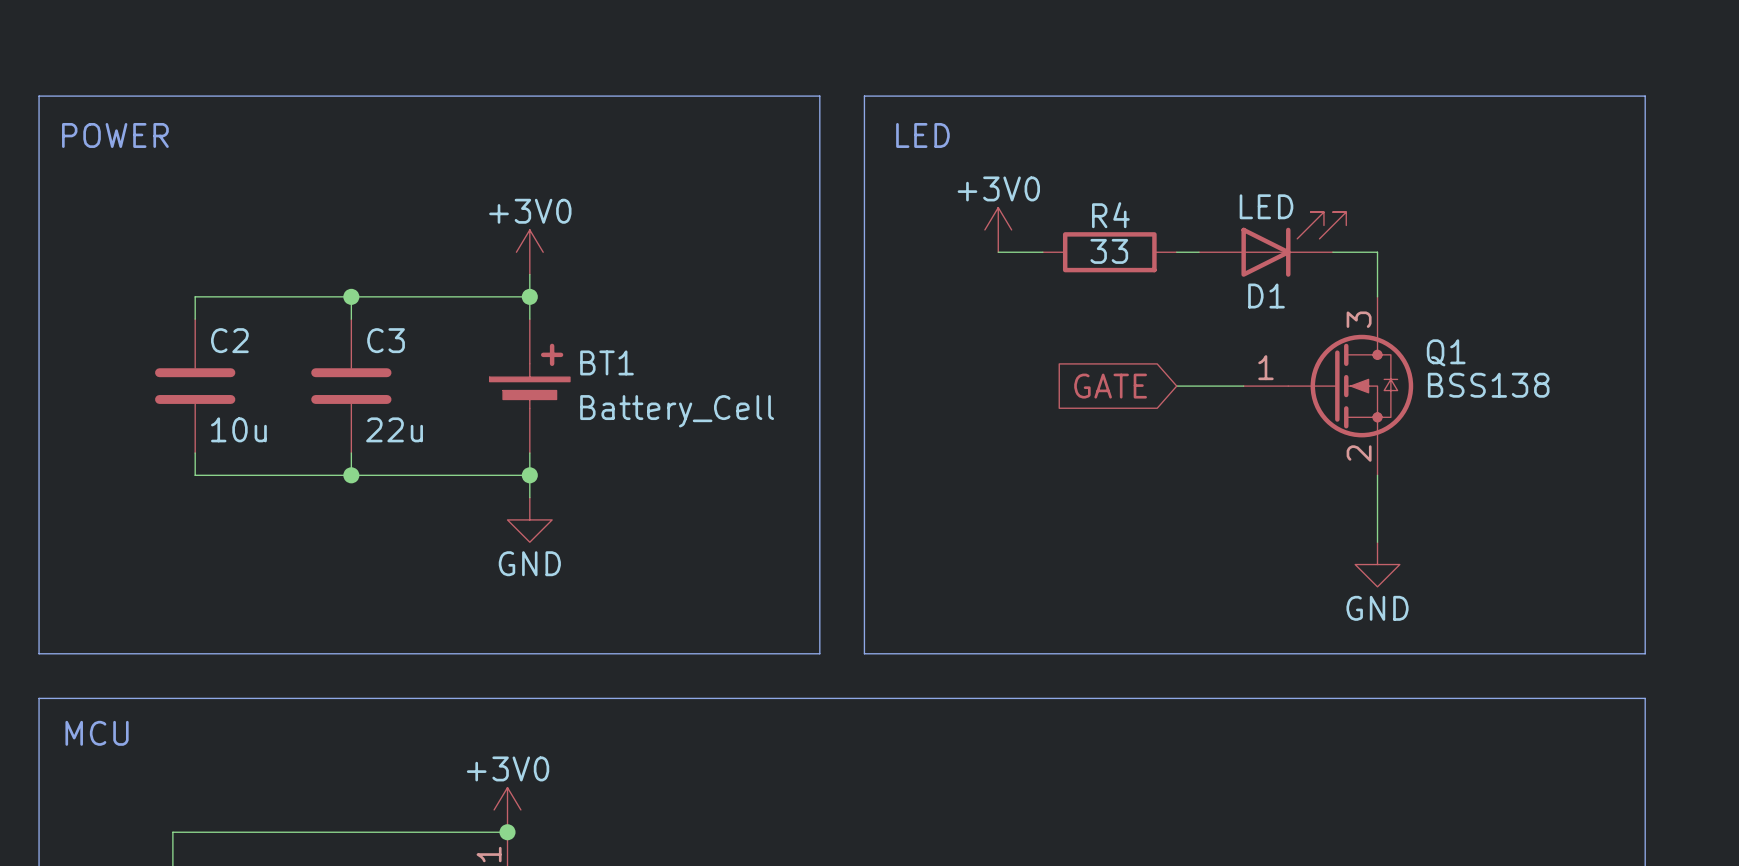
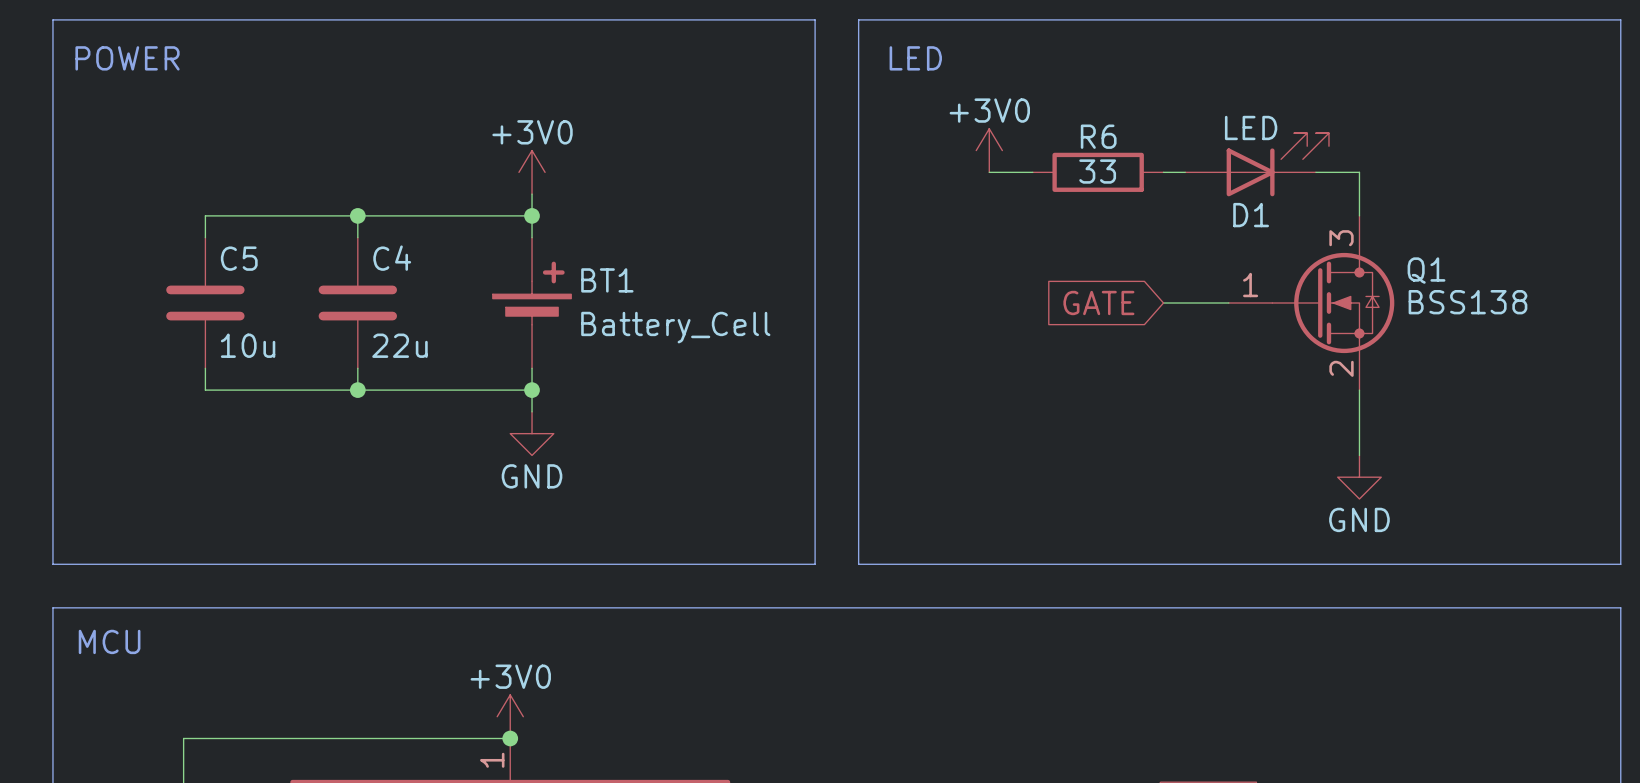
R4 name: R4 (1110, 215) -> R6 (1098, 136)
C2 name: C2 (229, 340) -> C5 (239, 258)
C3 name: C3 (386, 340) -> C4 (392, 258)

